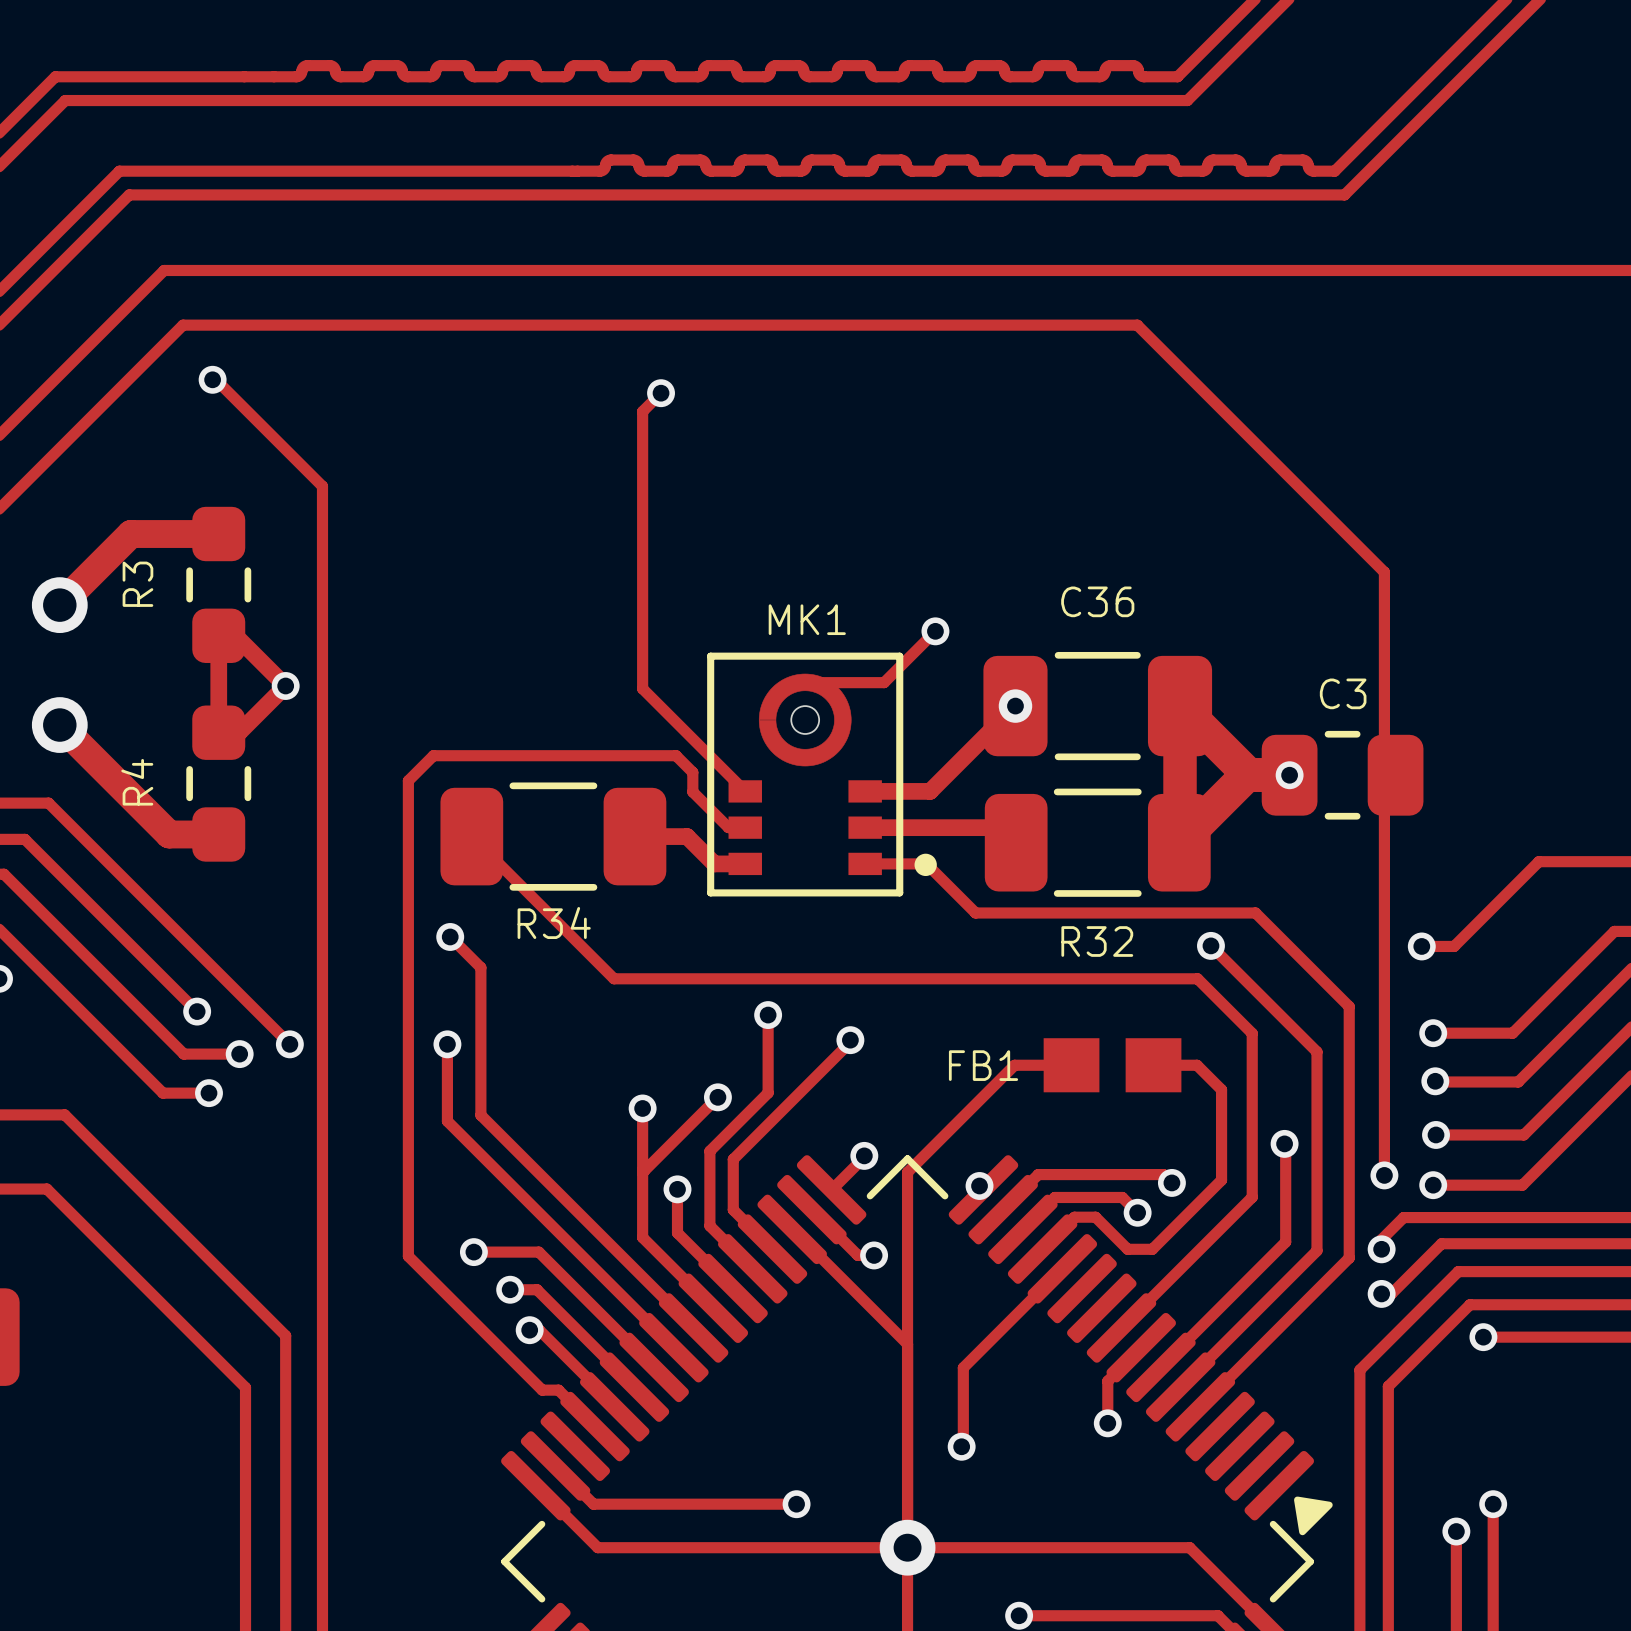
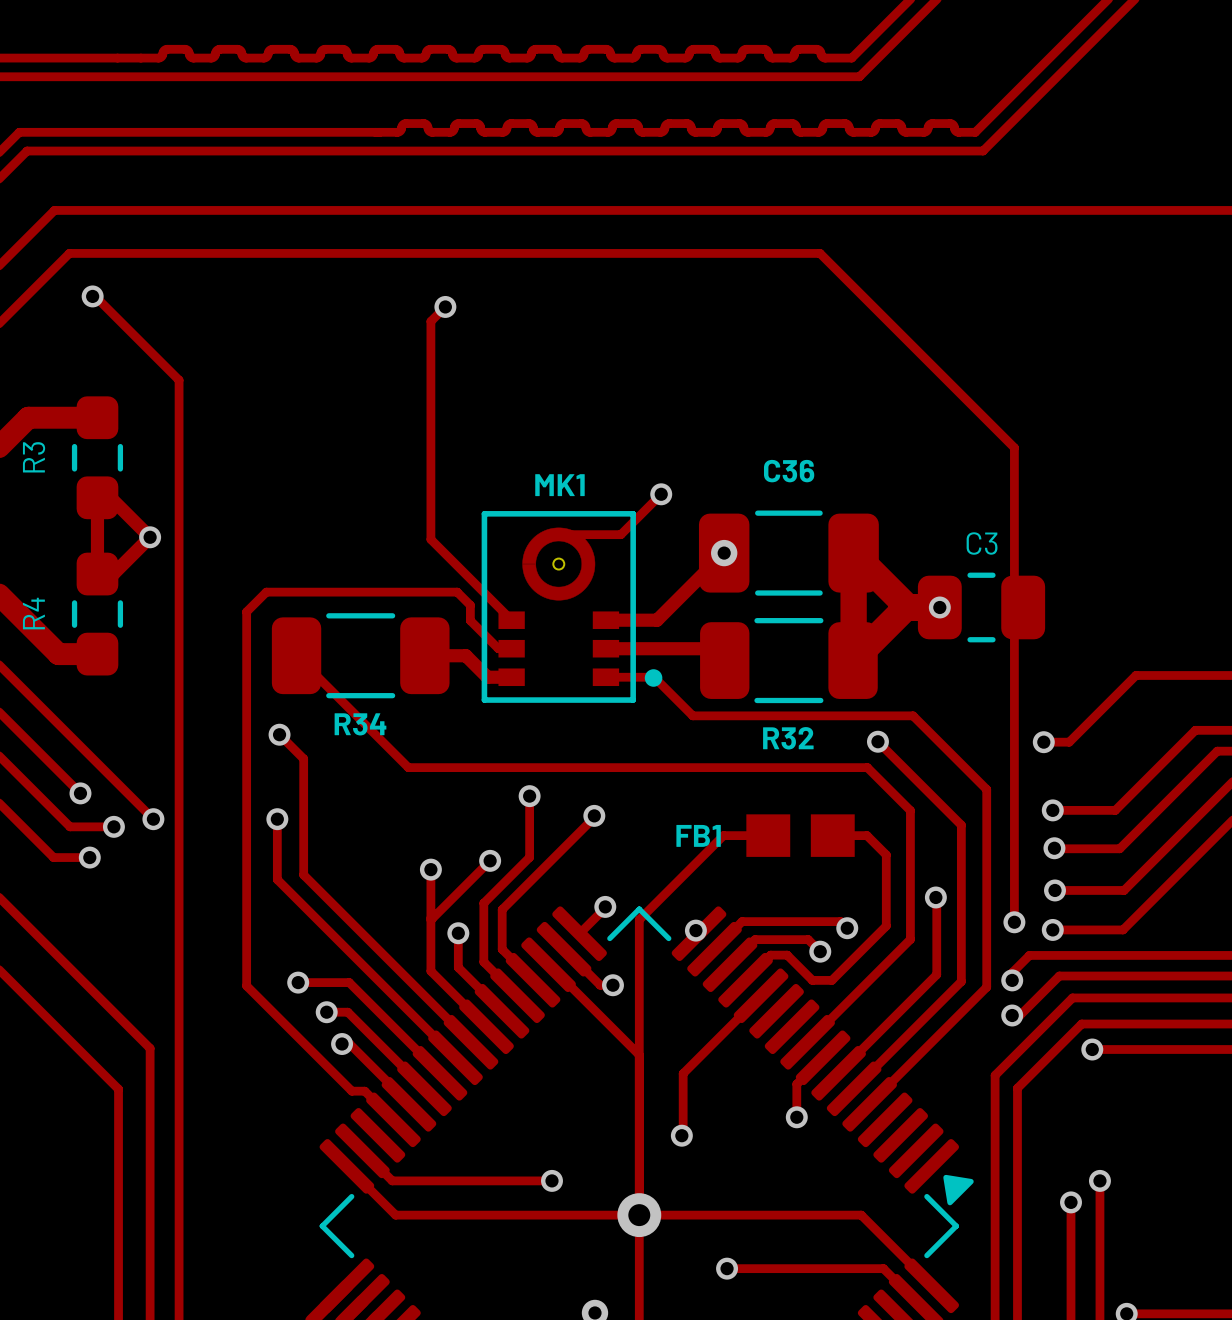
MK1 footprint: [707, 652, 937, 897] -> [481, 511, 663, 703]

